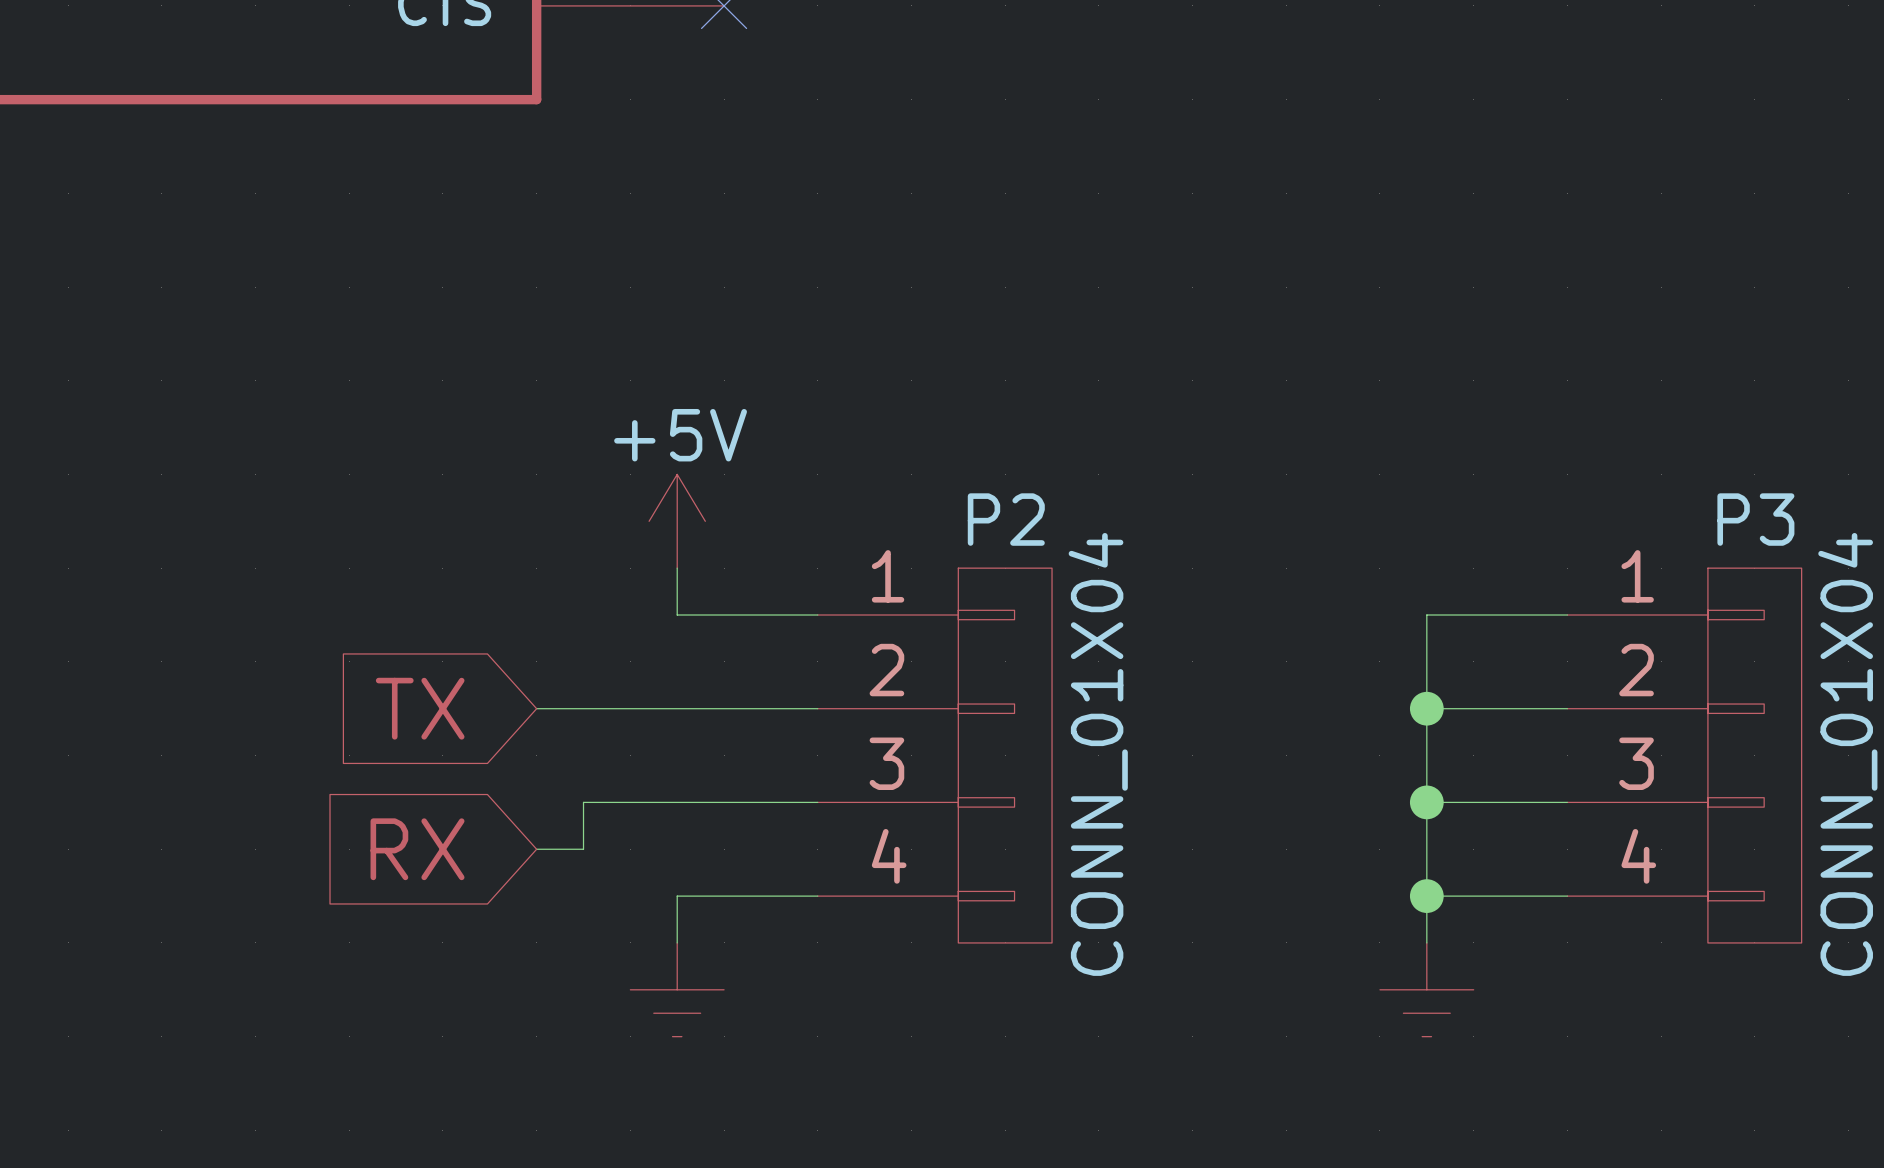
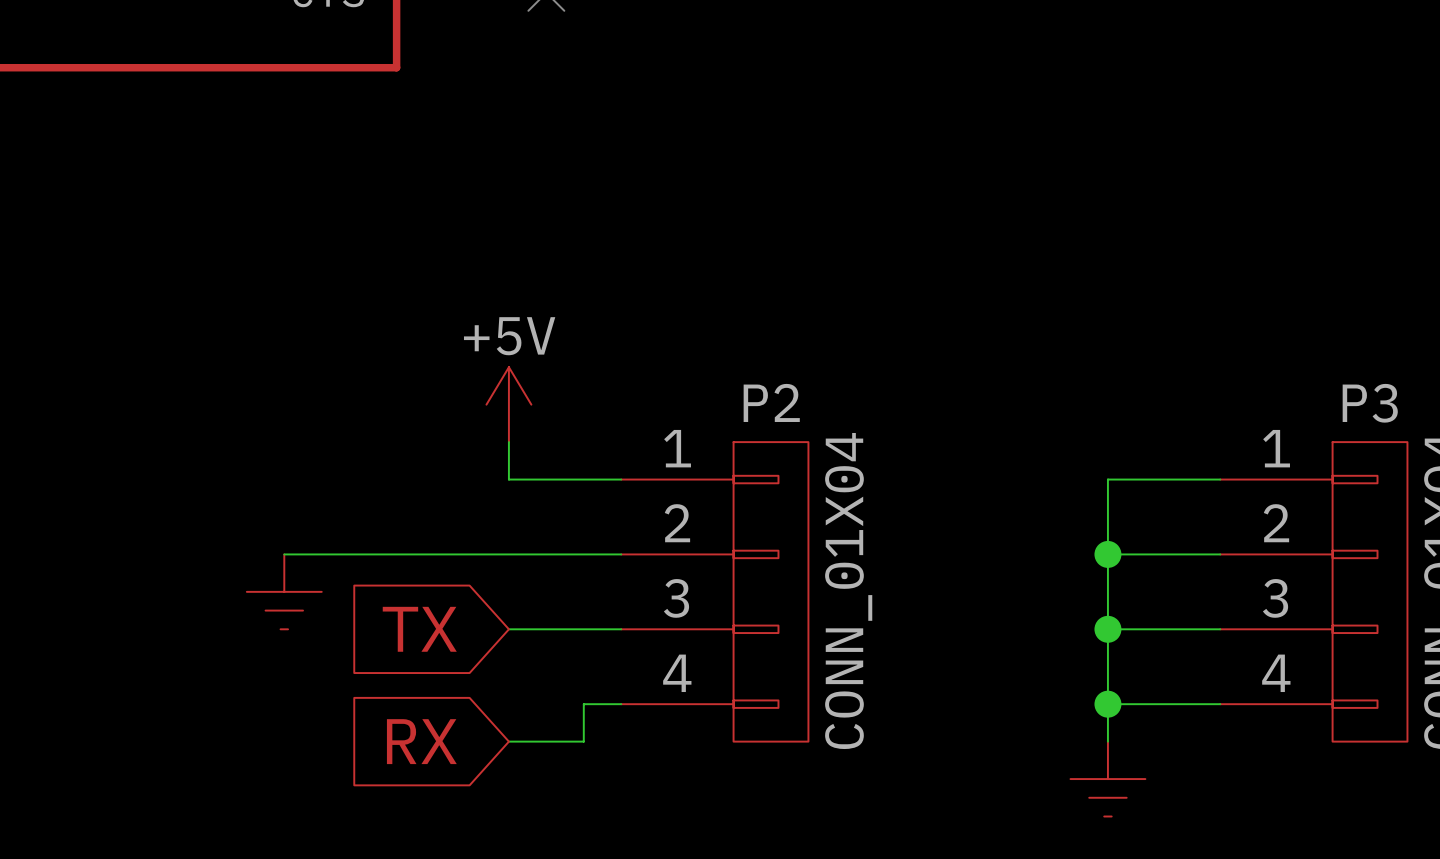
wire: none -> (284, 554) (396, 554)
global label position: TX (420, 708) -> TX (419, 629)
wire: (677, 802) (583, 802) (583, 849) (536, 849) -> none
global label position: RX (417, 849) -> RX (421, 741)
wire: (770, 896) (677, 896) (677, 942) -> (583, 704) (583, 741) (508, 741)
power symbol position: (677, 989) -> (284, 591)

